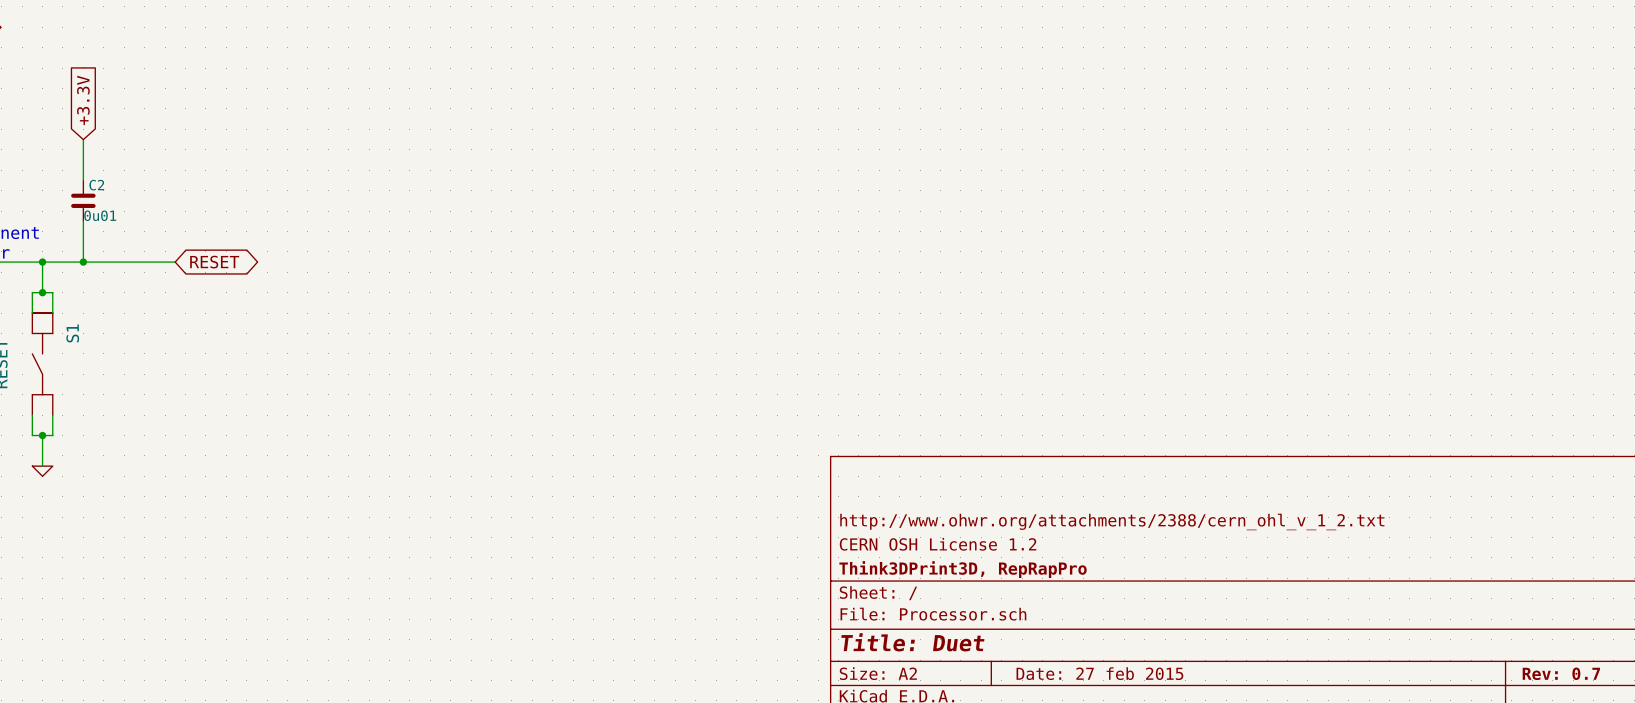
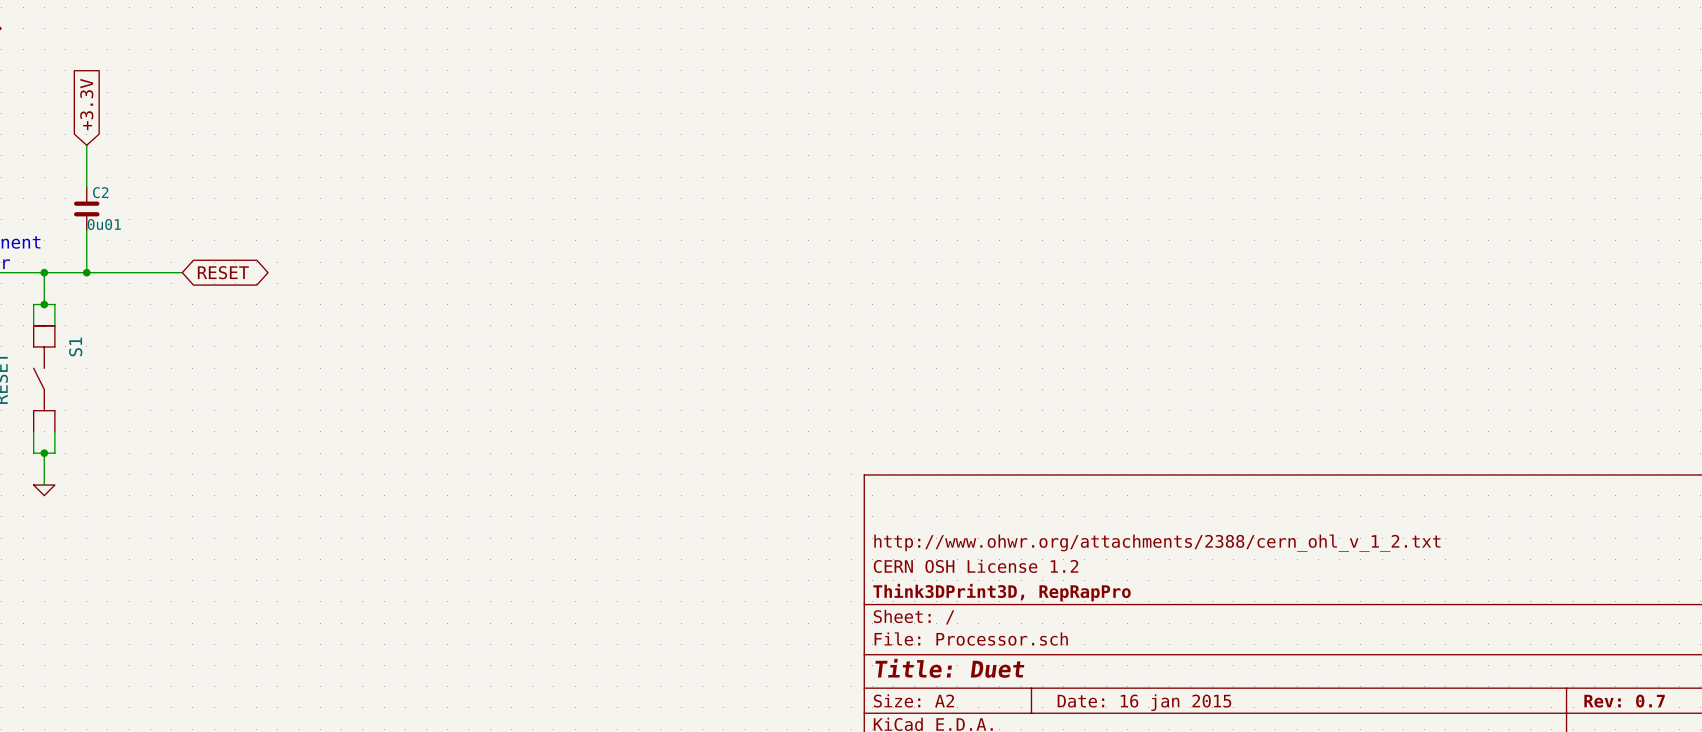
title block: Date: 27 feb 2015 (1099, 673) -> Date: 16 jan 2015 (1144, 702)

